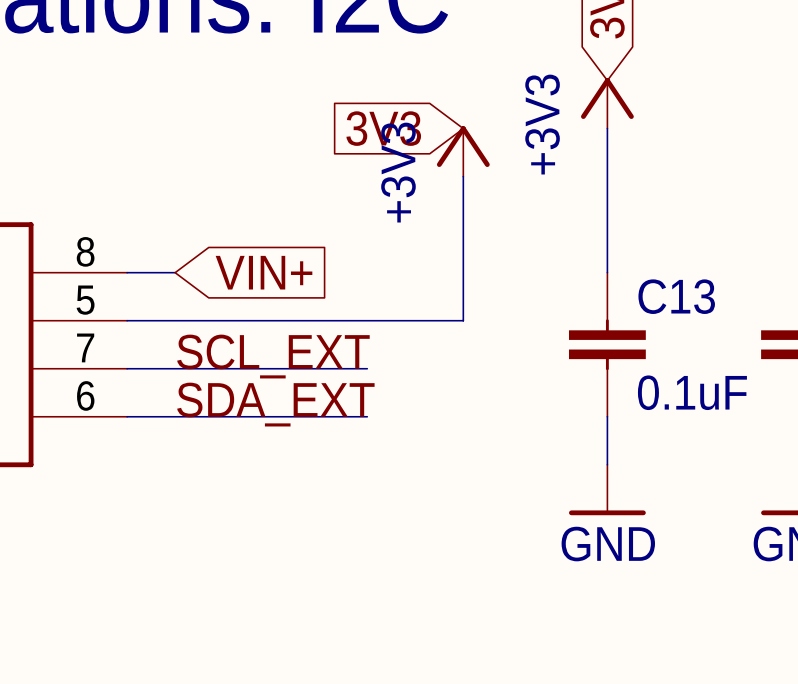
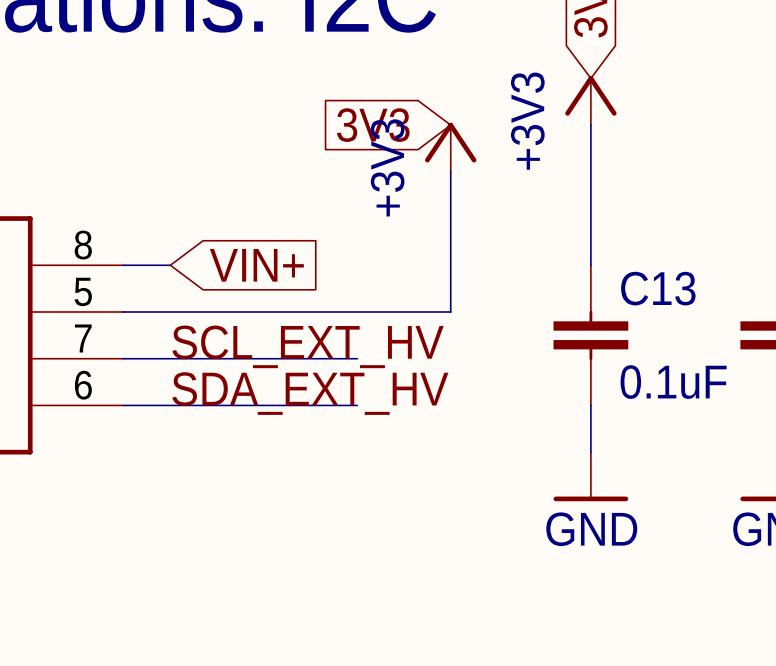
label: SCL_EXT (273, 356) -> SCL_EXT_HV (308, 346)
label: SDA_EXT (275, 404) -> SDA_EXT_HV (310, 393)

